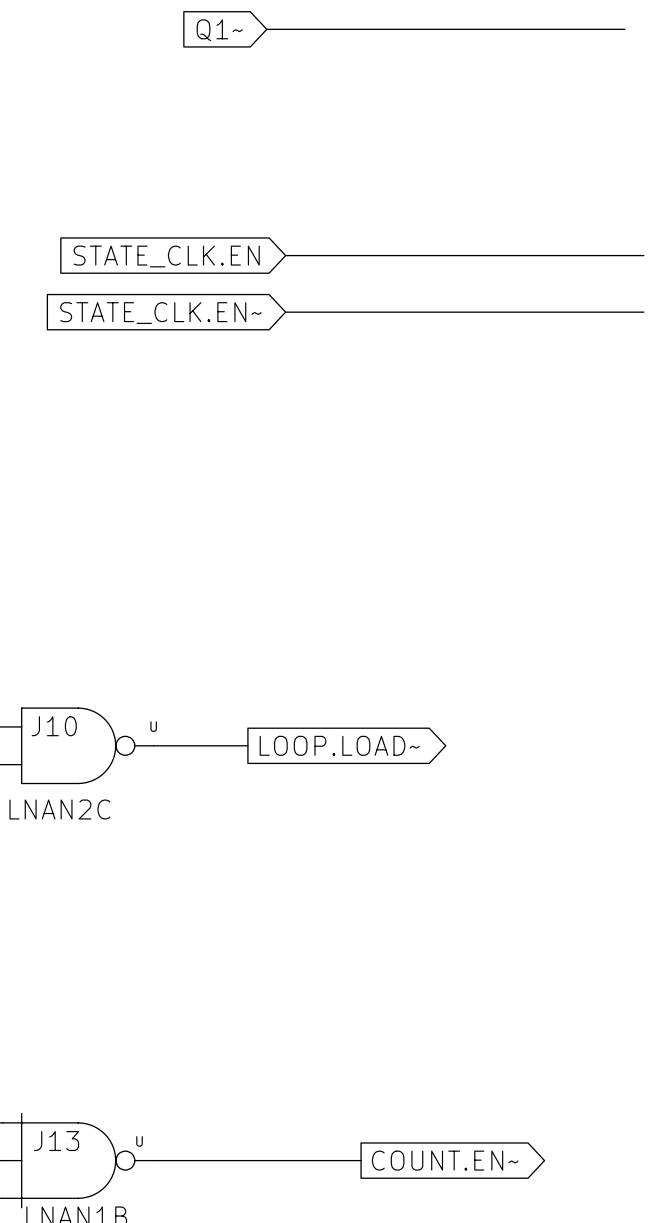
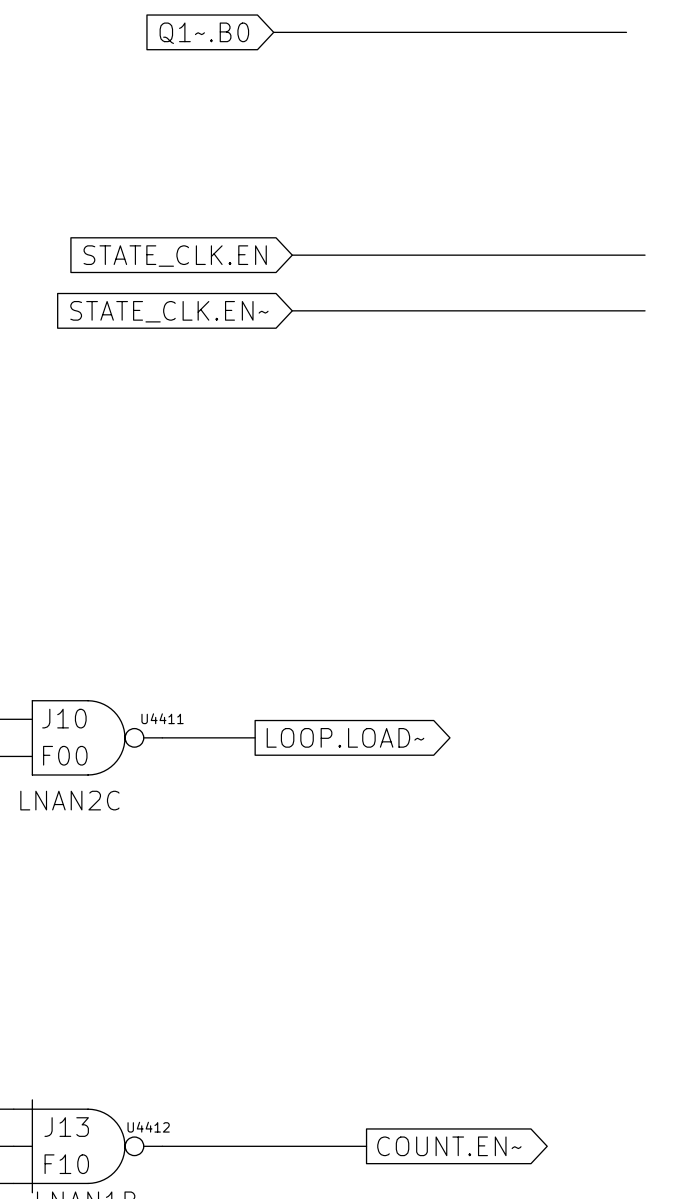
global label: Q1~ (219, 30) -> Q1~.B0 (204, 33)
U name: U (153, 726) -> U4411 (162, 718)
U value: none -> F00 (65, 755)
U name: U (139, 1141) -> U4412 (148, 1127)
U value: none -> F10 (66, 1164)

